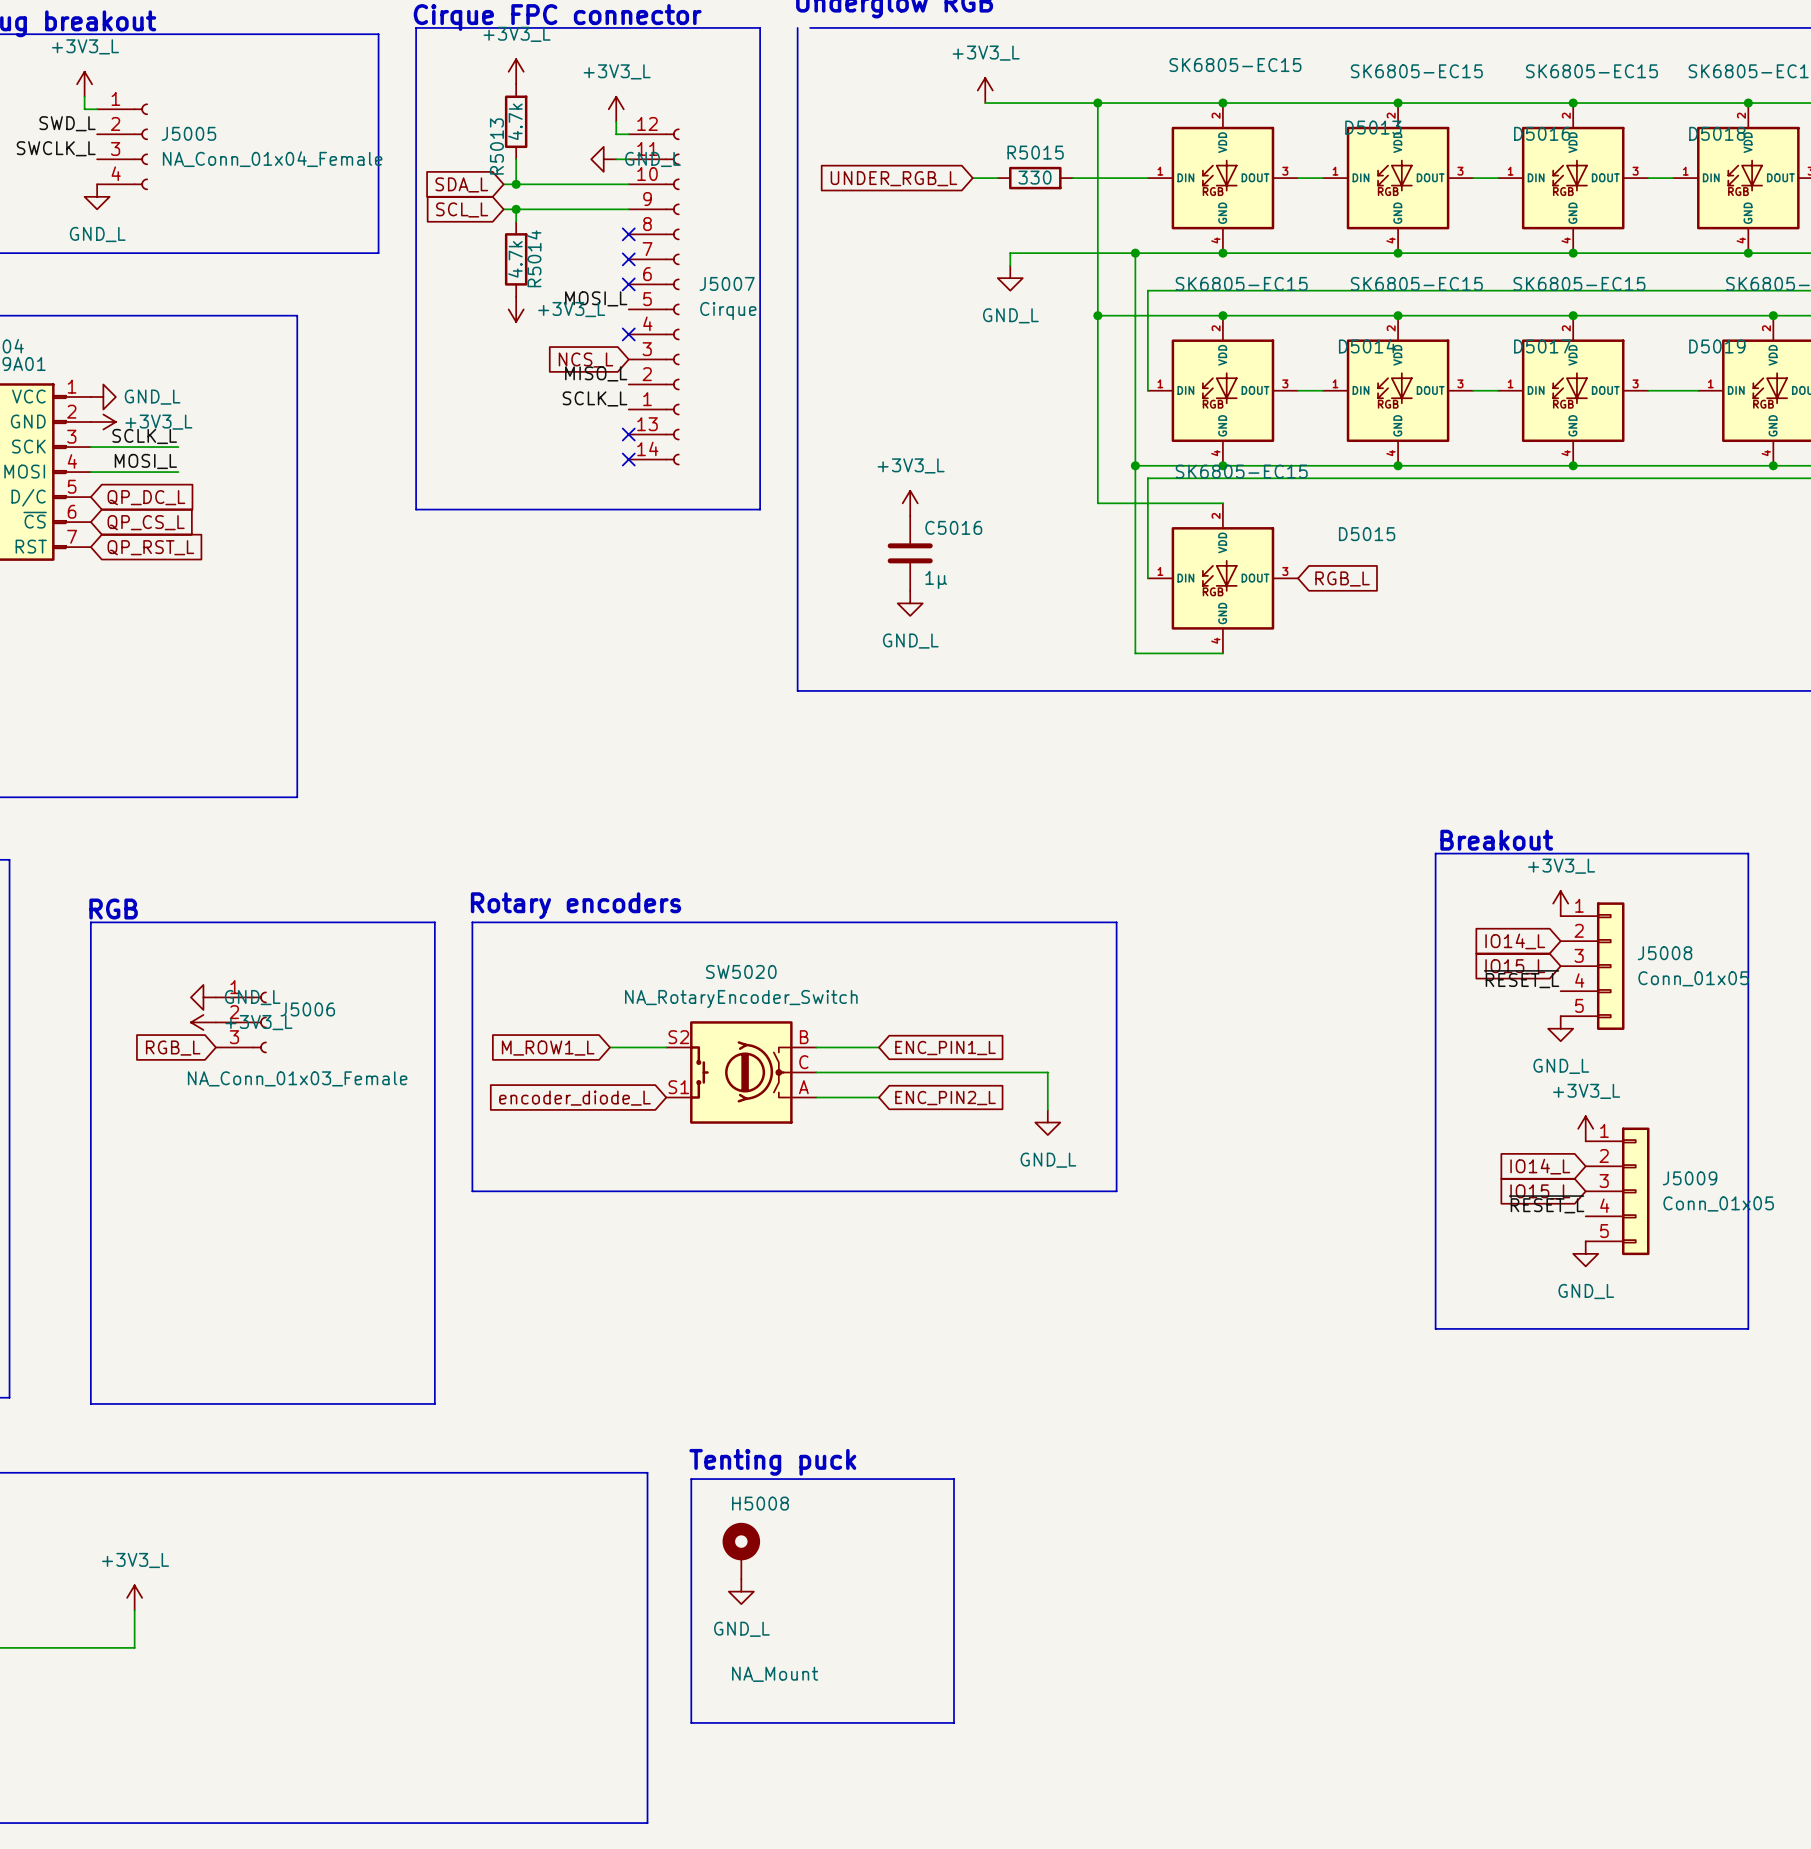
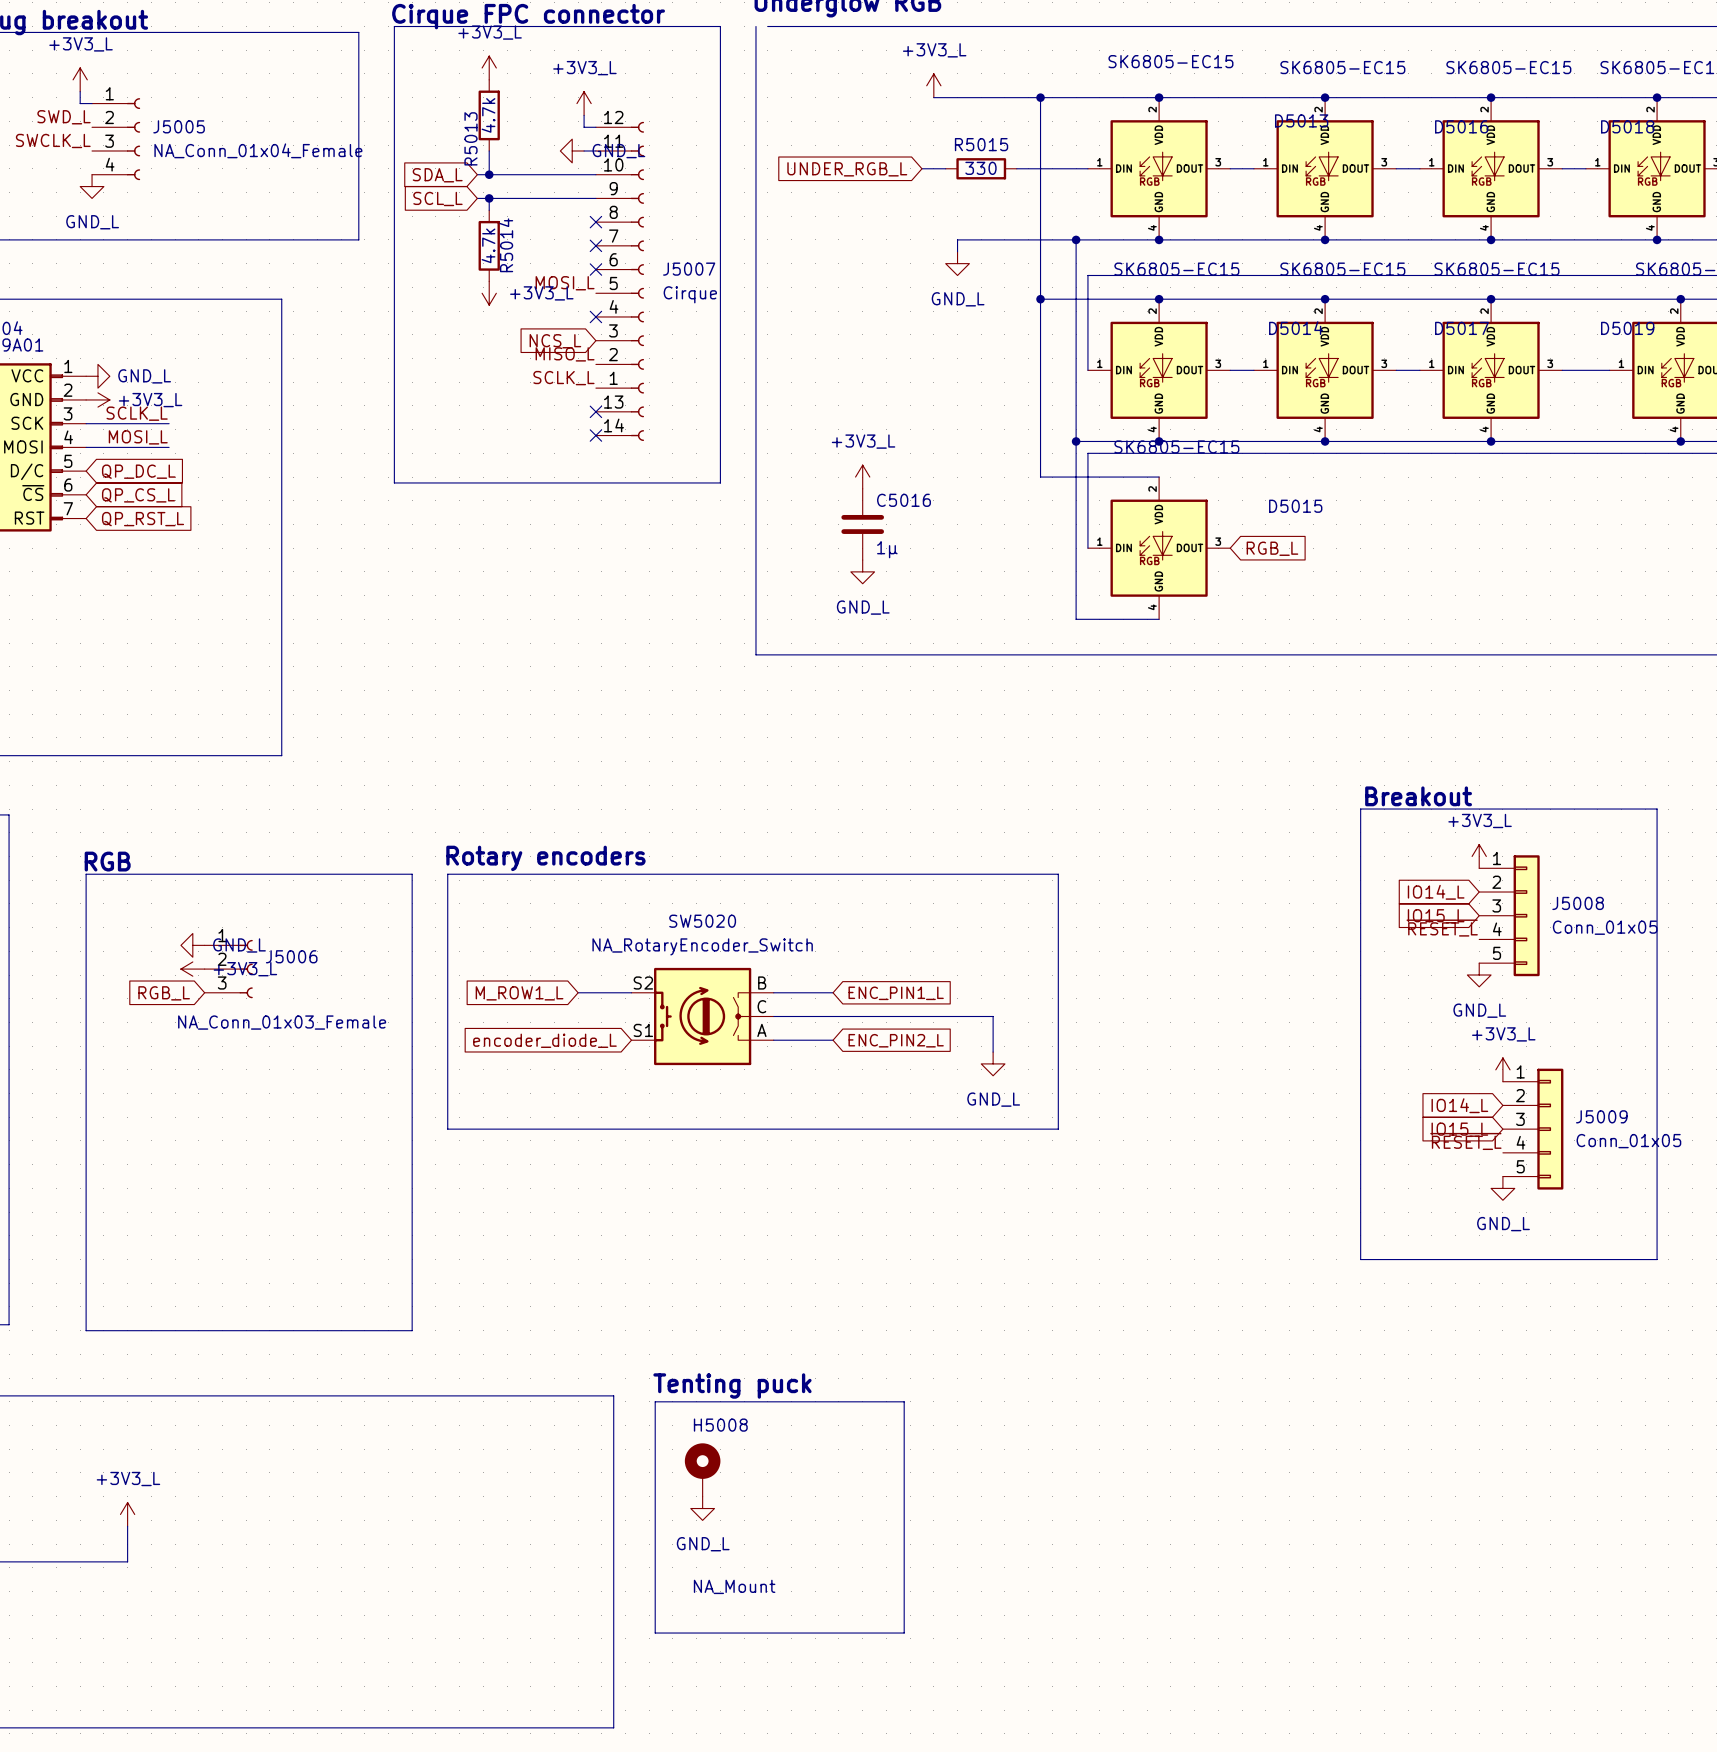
SW5020 symbol: [666, 1021, 817, 1124] -> [631, 967, 774, 1066]

